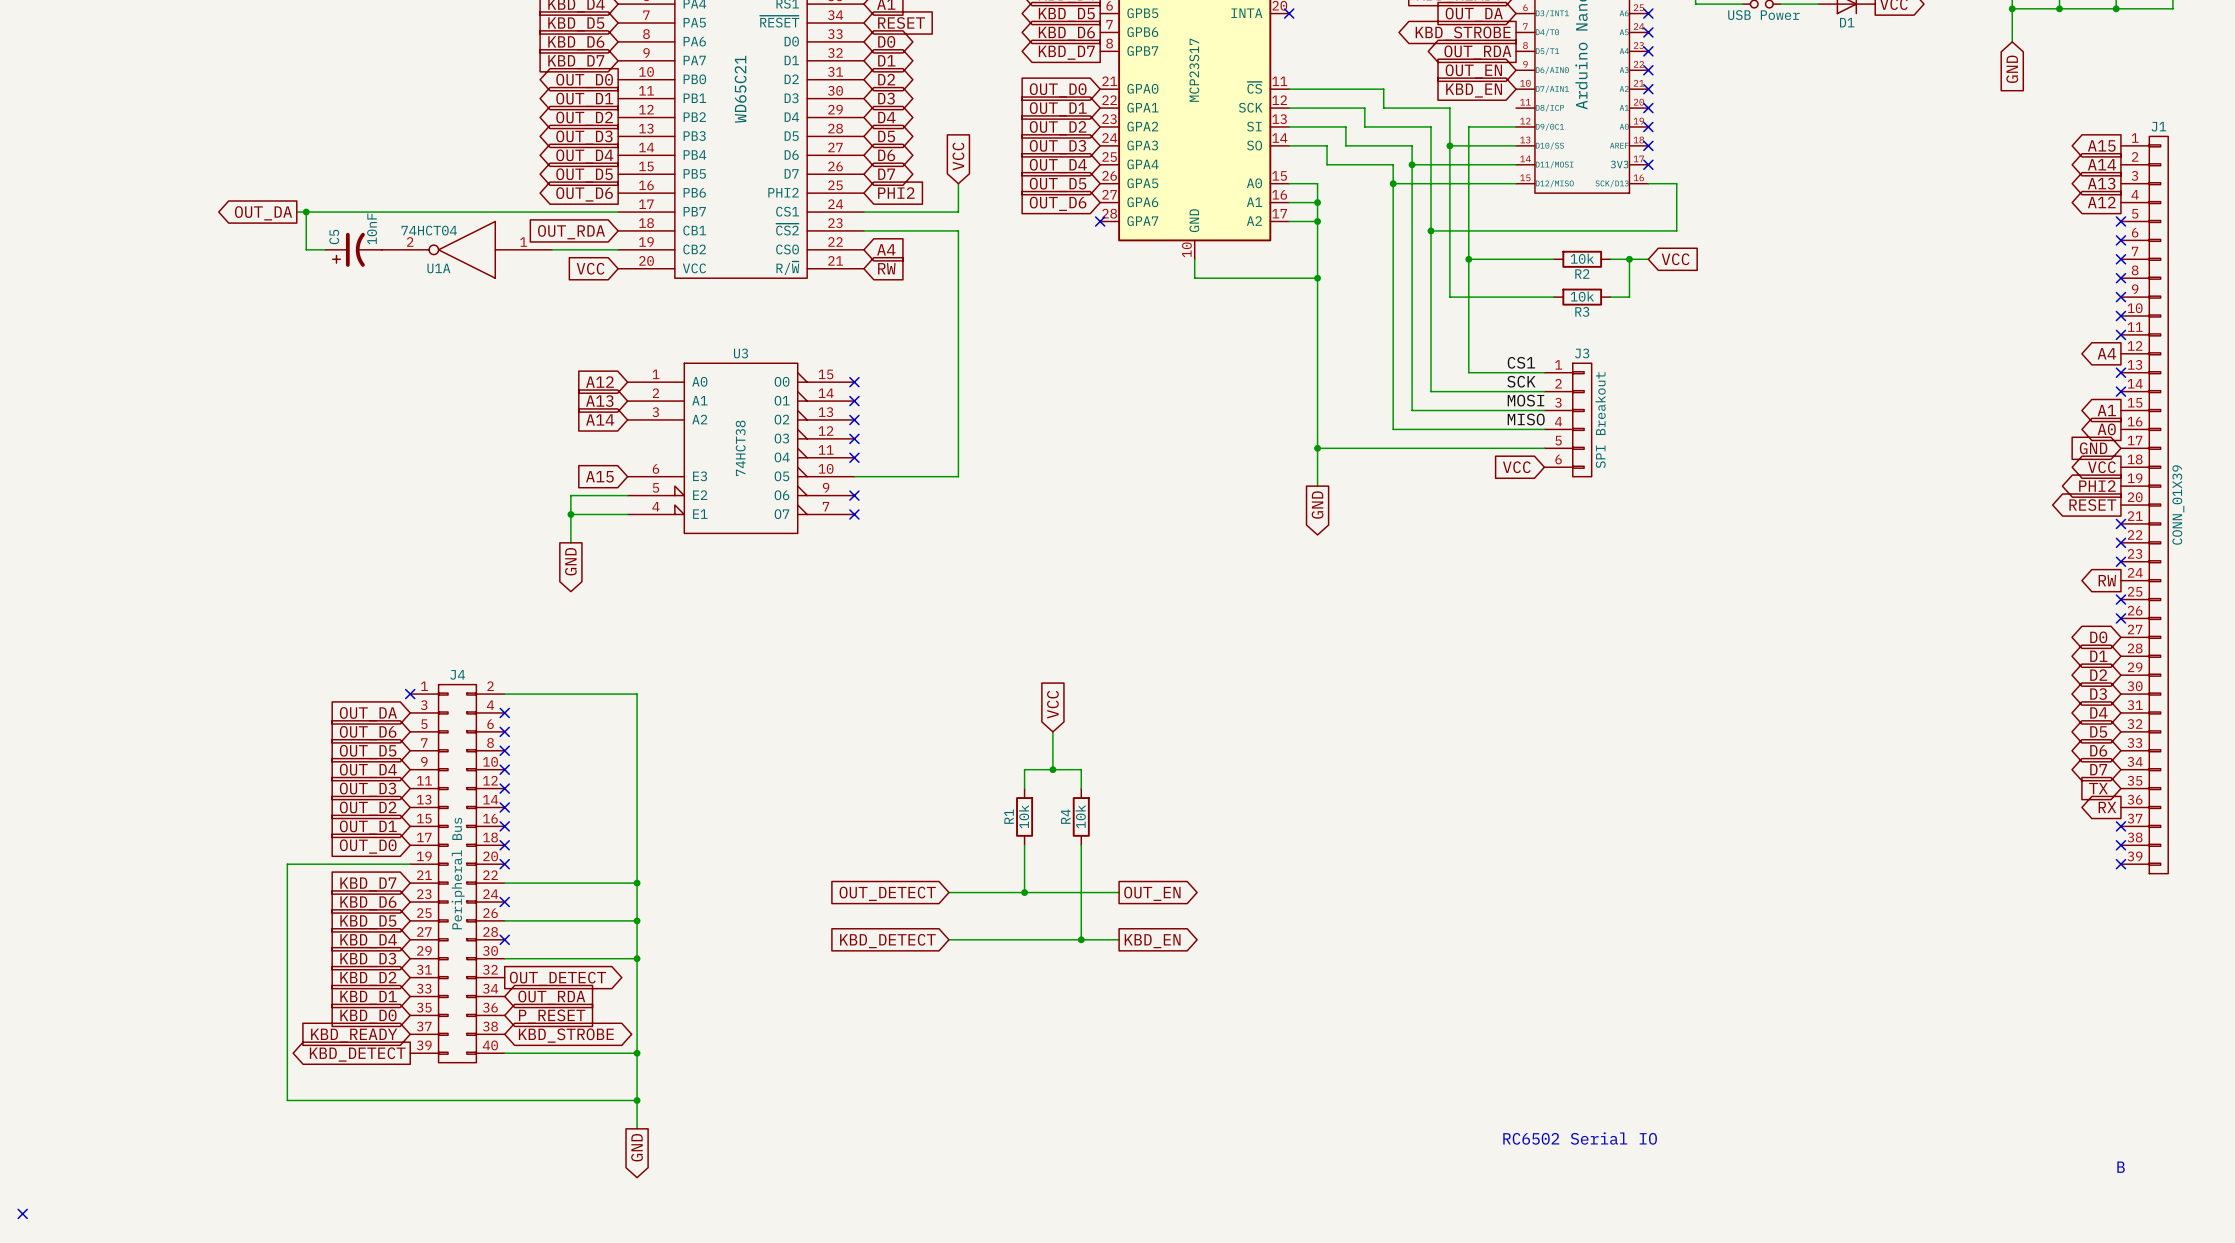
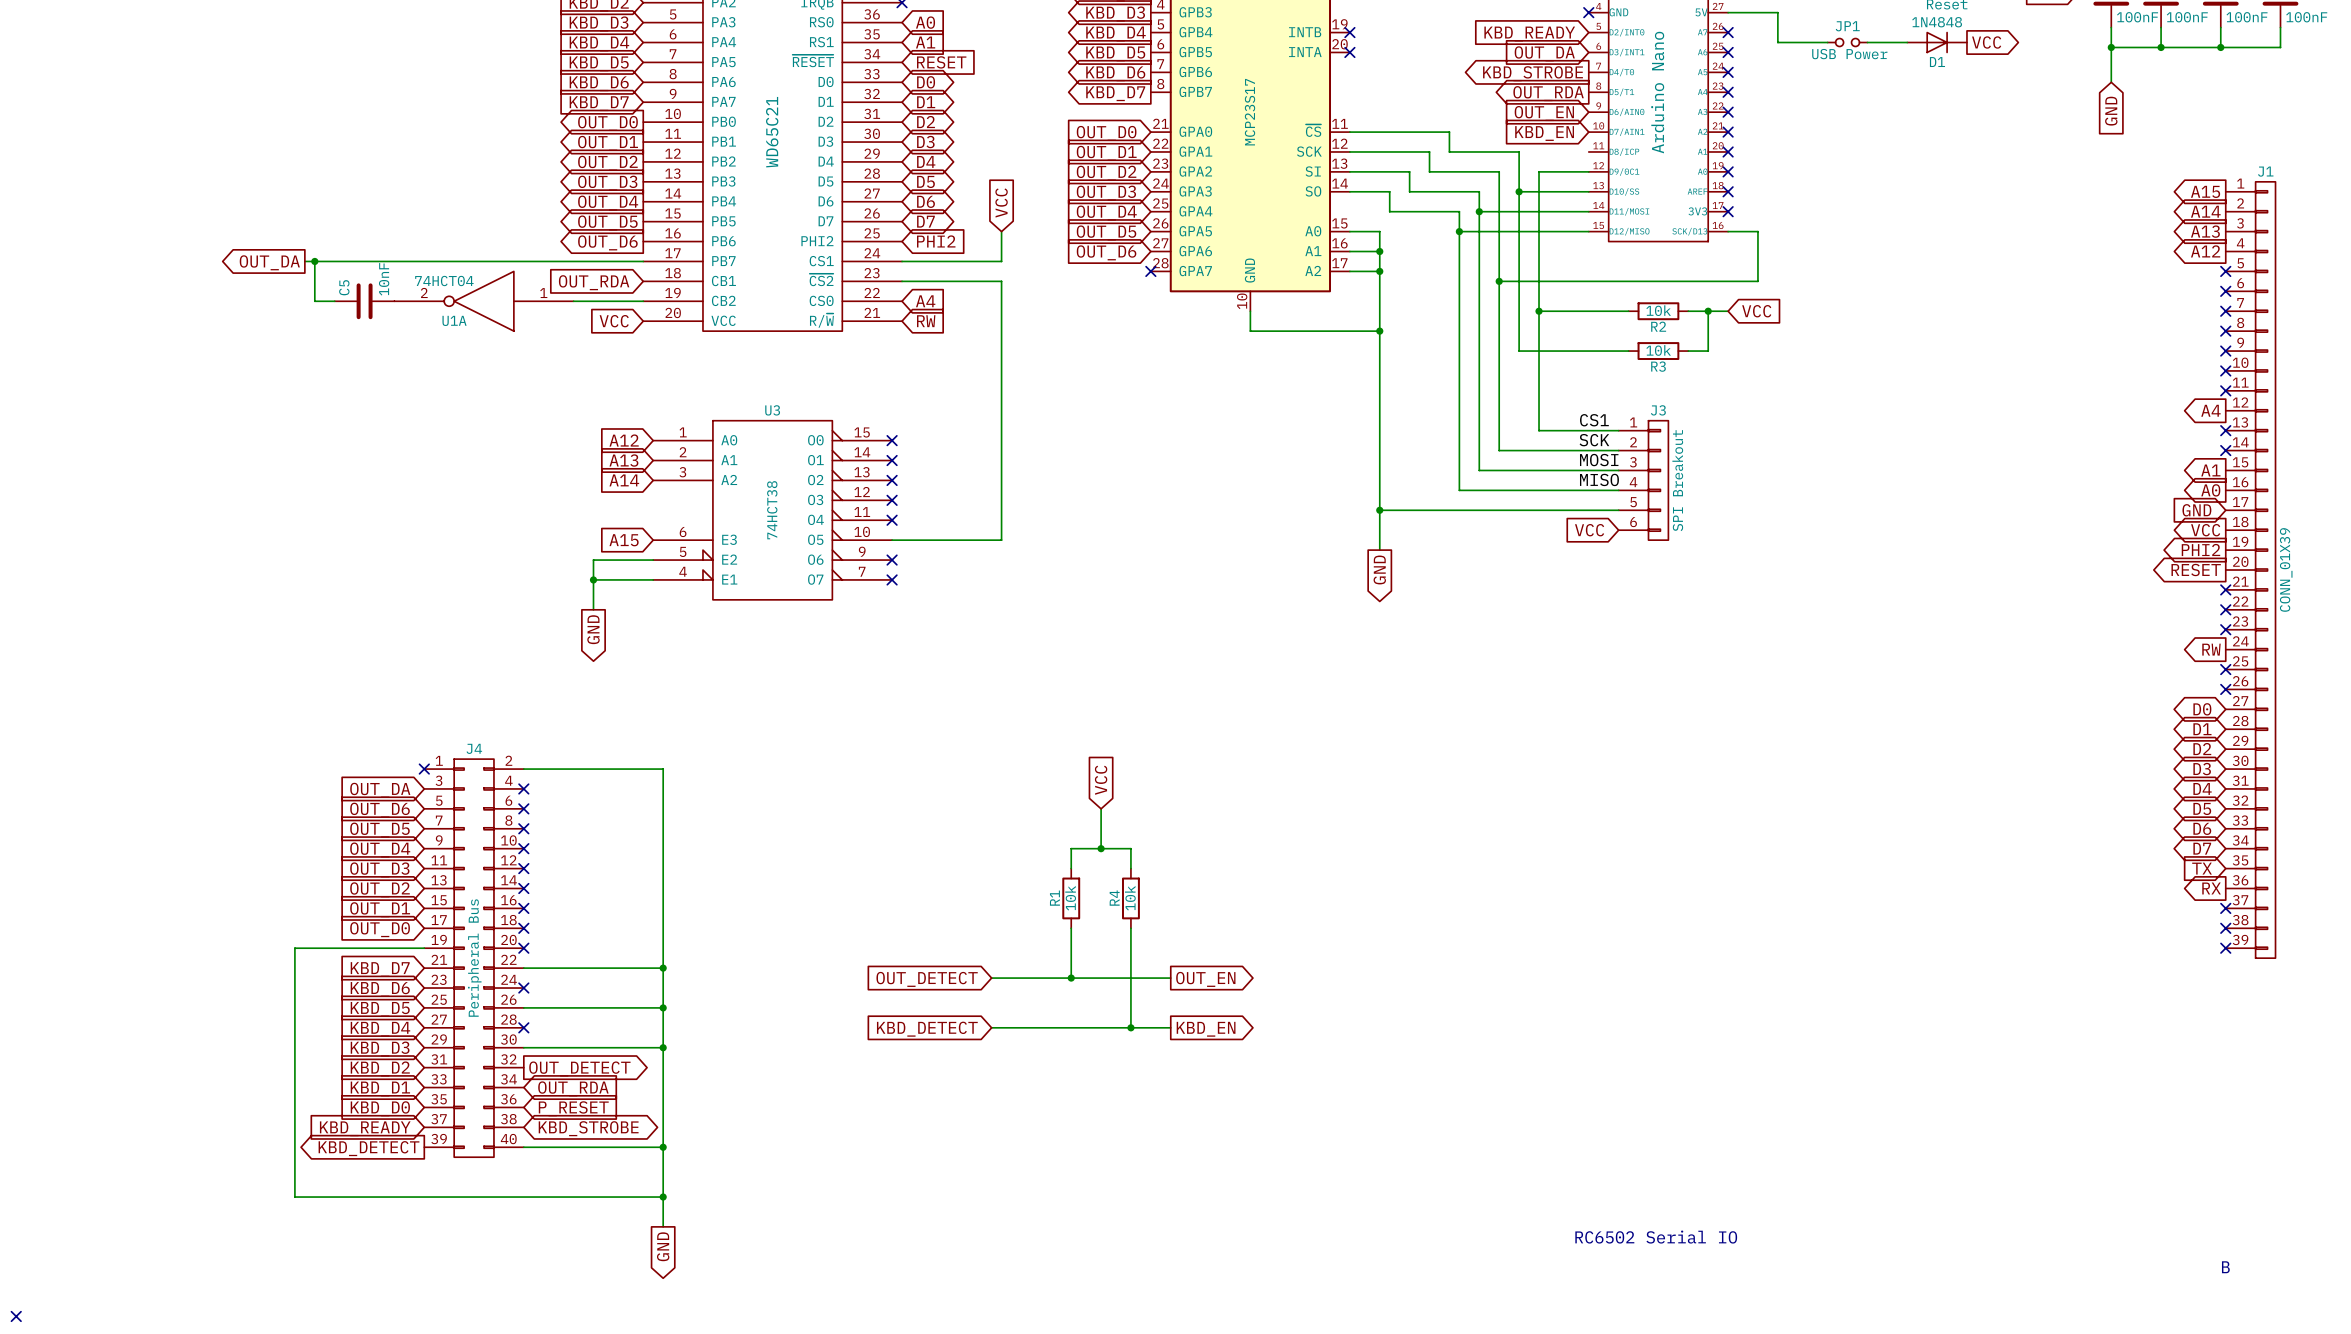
C5 symbol: [325, 232, 382, 267] -> [334, 283, 395, 320]

